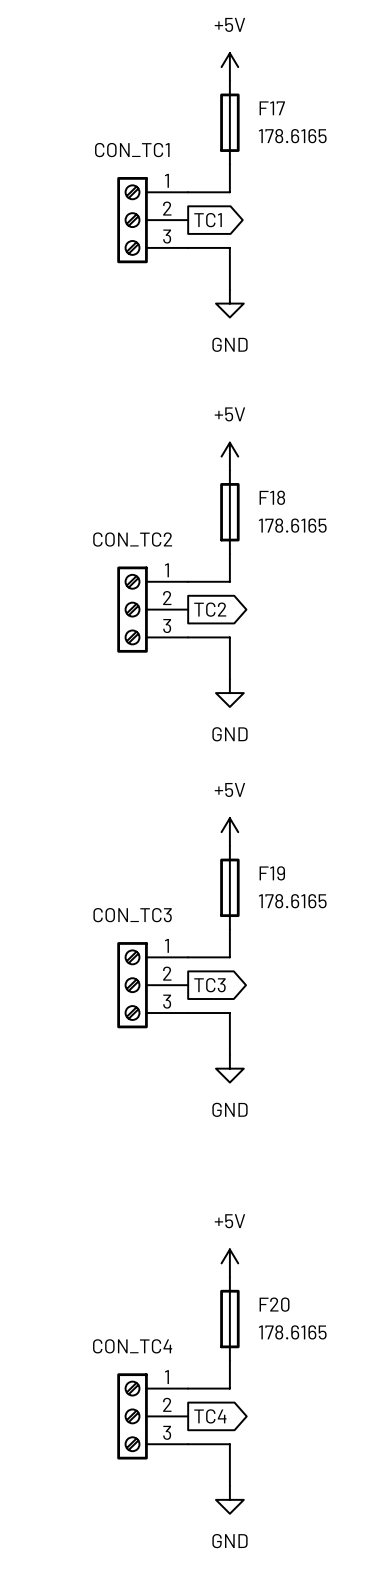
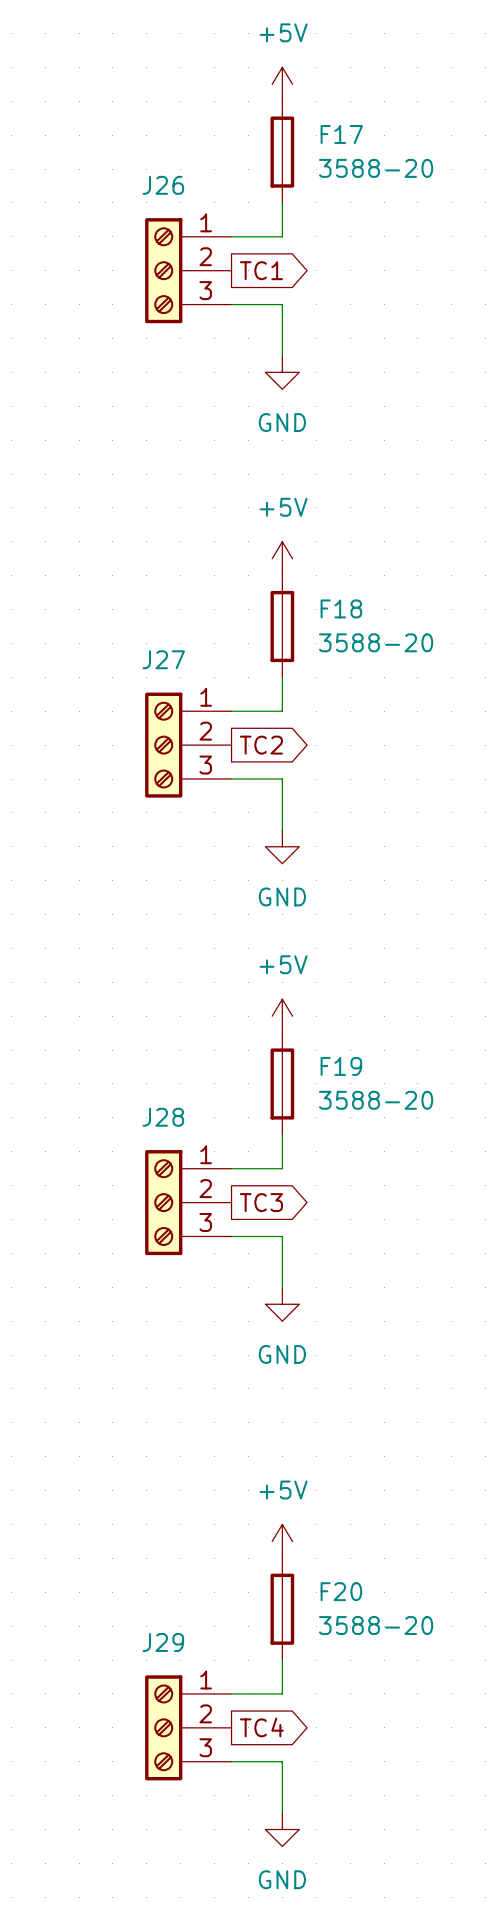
F17 value: 178.6165 (292, 136) -> 3588-20 (376, 168)
CON_TC1 name: CON_TC1 (132, 150) -> J26 (163, 185)
F18 value: 178.6165 (292, 525) -> 3588-20 (376, 642)
CON_TC2 name: CON_TC2 (132, 539) -> J27 (163, 659)
F19 value: 178.6165 (292, 901) -> 3588-20 (376, 1100)
CON_TC3 name: CON_TC3 (132, 915) -> J28 (163, 1117)
F20 value: 178.6165 (292, 1332) -> 3588-20 (376, 1625)
CON_TC4 name: CON_TC4 (132, 1346) -> J29 (163, 1642)

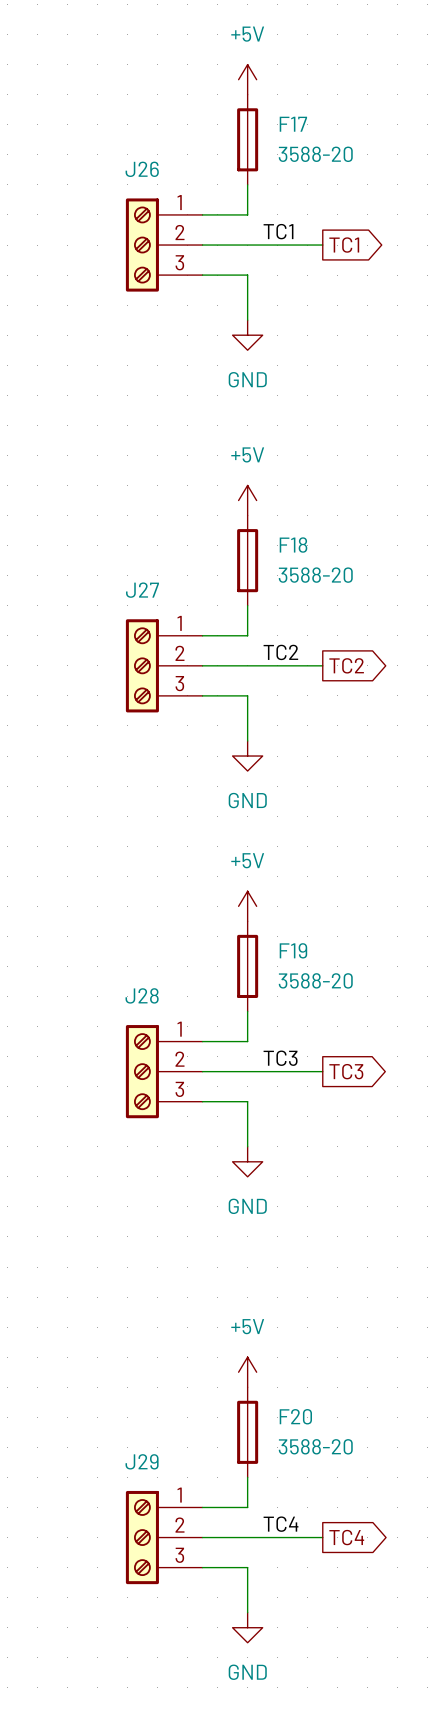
label: none -> TC1 (278, 231)
wire: none -> (202, 245) (322, 245)
global label position: TC1 (261, 270) -> TC1 (344, 245)
label: none -> TC2 (280, 652)
wire: none -> (202, 665) (322, 665)
global label position: TC2 (261, 745) -> TC2 (346, 665)
label: none -> TC3 (280, 1058)
wire: none -> (202, 1071) (322, 1071)
global label position: TC3 (261, 1202) -> TC3 (346, 1071)
label: none -> TC4 (281, 1524)
wire: none -> (202, 1537) (322, 1537)
global label position: TC4 (261, 1727) -> TC4 (346, 1537)

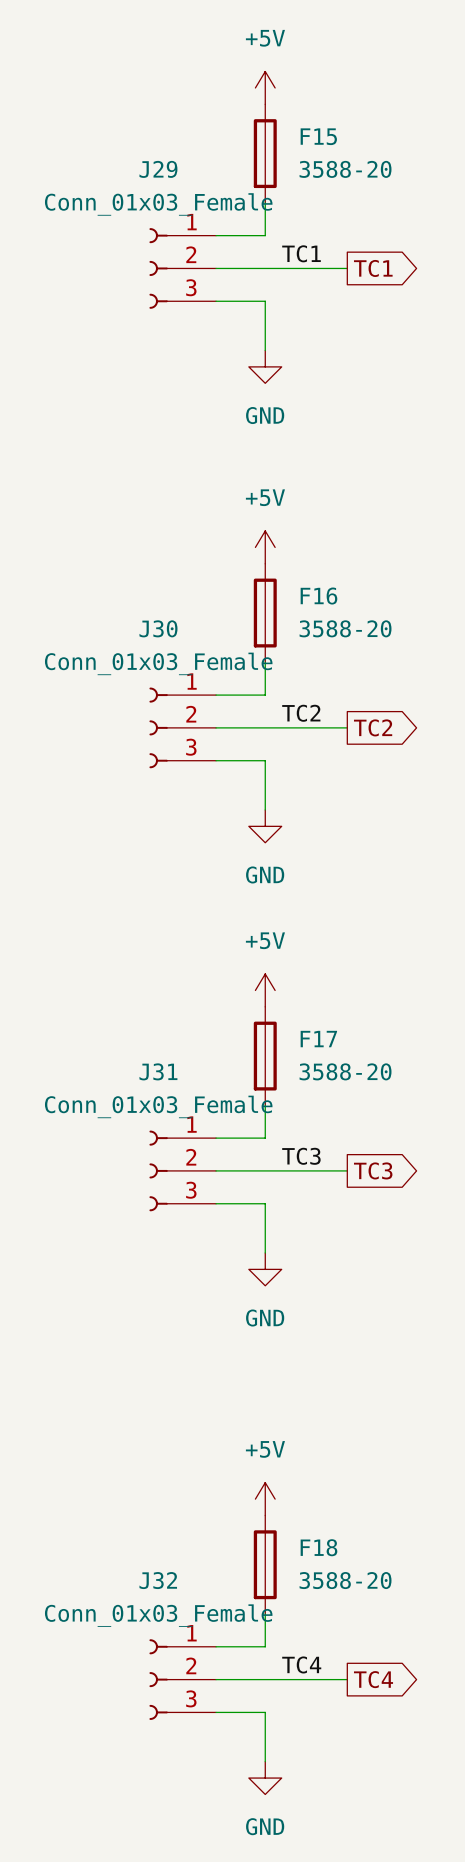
F17 name: F17 (293, 124) -> F15 (318, 136)
J29 value: none -> Conn_01x03_Female (158, 204)
J26: (164, 245) -> none
F18 name: F18 (293, 545) -> F16 (318, 596)
J27: (164, 665) -> none
J30: none -> Conn_01x03_Female (182, 727)
F19 name: F19 (293, 950) -> F17 (318, 1039)
J28: (164, 1071) -> none
J31: none -> Conn_01x03_Female (182, 1170)
F20 name: F20 (295, 1416) -> F18 (318, 1547)
J29 symbol: [125, 1490, 203, 1585] -> [149, 228, 217, 309]
J32: none -> Conn_01x03_Female (182, 1679)

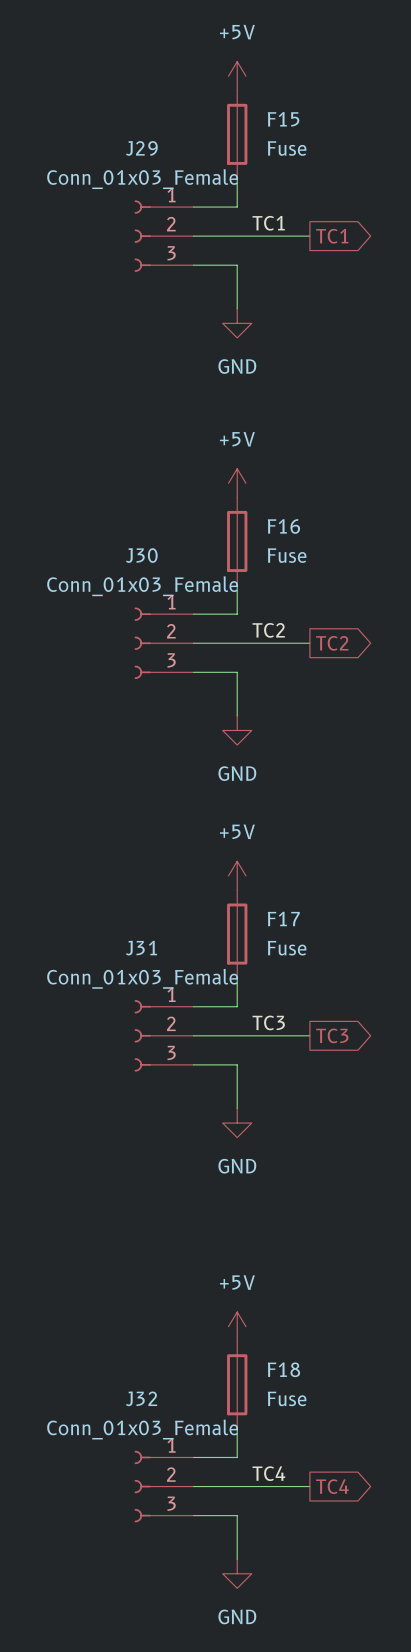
F15 value: 3588-20 (345, 169) -> Fuse (287, 148)
F16 value: 3588-20 (345, 628) -> Fuse (287, 555)
F17 value: 3588-20 (345, 1071) -> Fuse (287, 948)
F18 value: 3588-20 (345, 1580) -> Fuse (287, 1398)

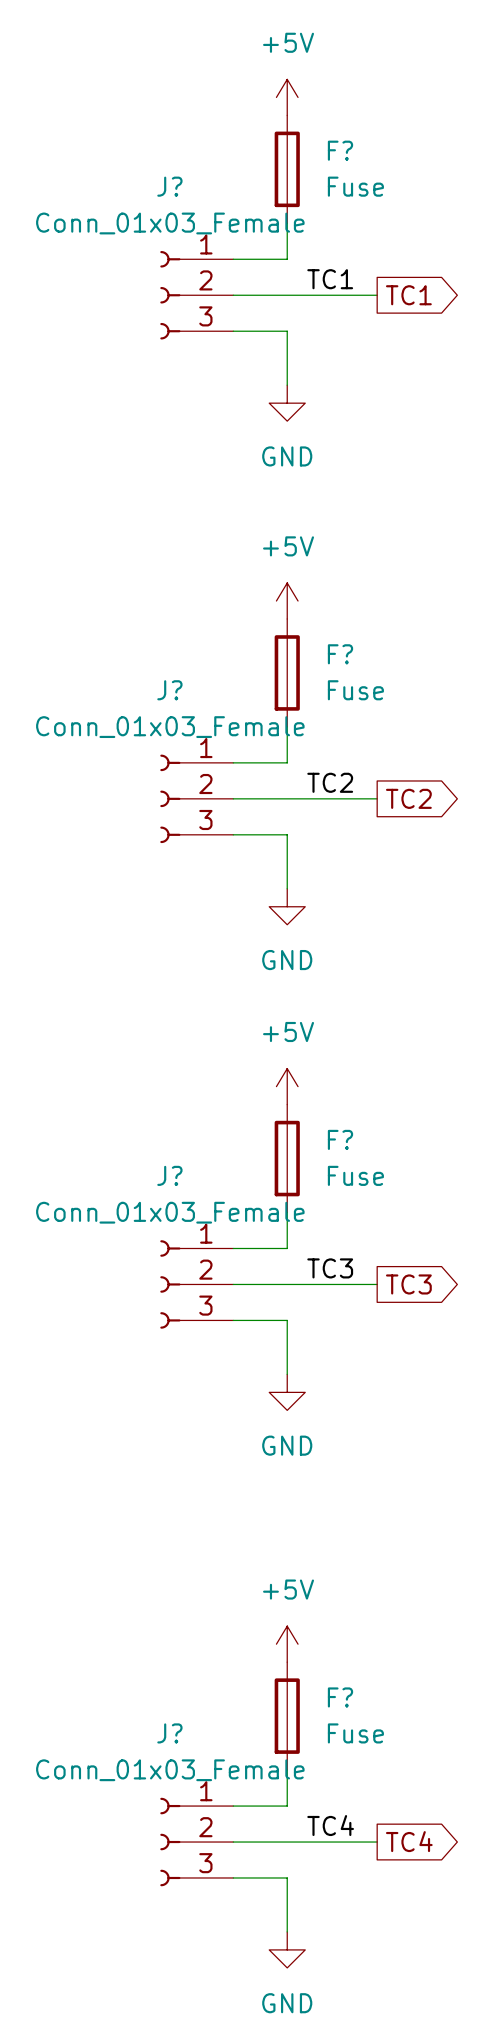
F15 name: F15 (283, 119) -> F? (340, 150)
J29 name: J29 (141, 148) -> J? (169, 186)
F16 name: F16 (283, 526) -> F? (340, 654)
J30 name: J30 (141, 555) -> J? (169, 690)
F17 name: F17 (283, 918) -> F? (340, 1139)
J31 name: J31 (141, 948) -> J? (169, 1175)
F18 name: F18 (283, 1369) -> F? (340, 1697)
J32 name: J32 (141, 1398) -> J? (169, 1733)

